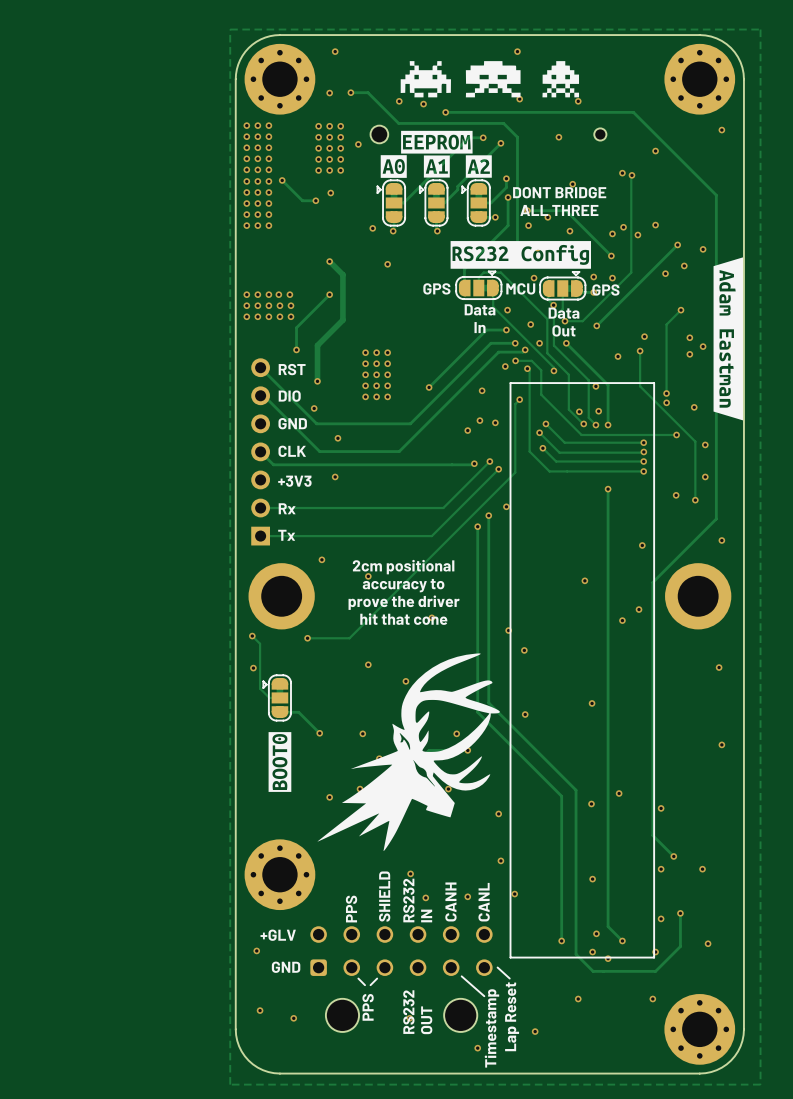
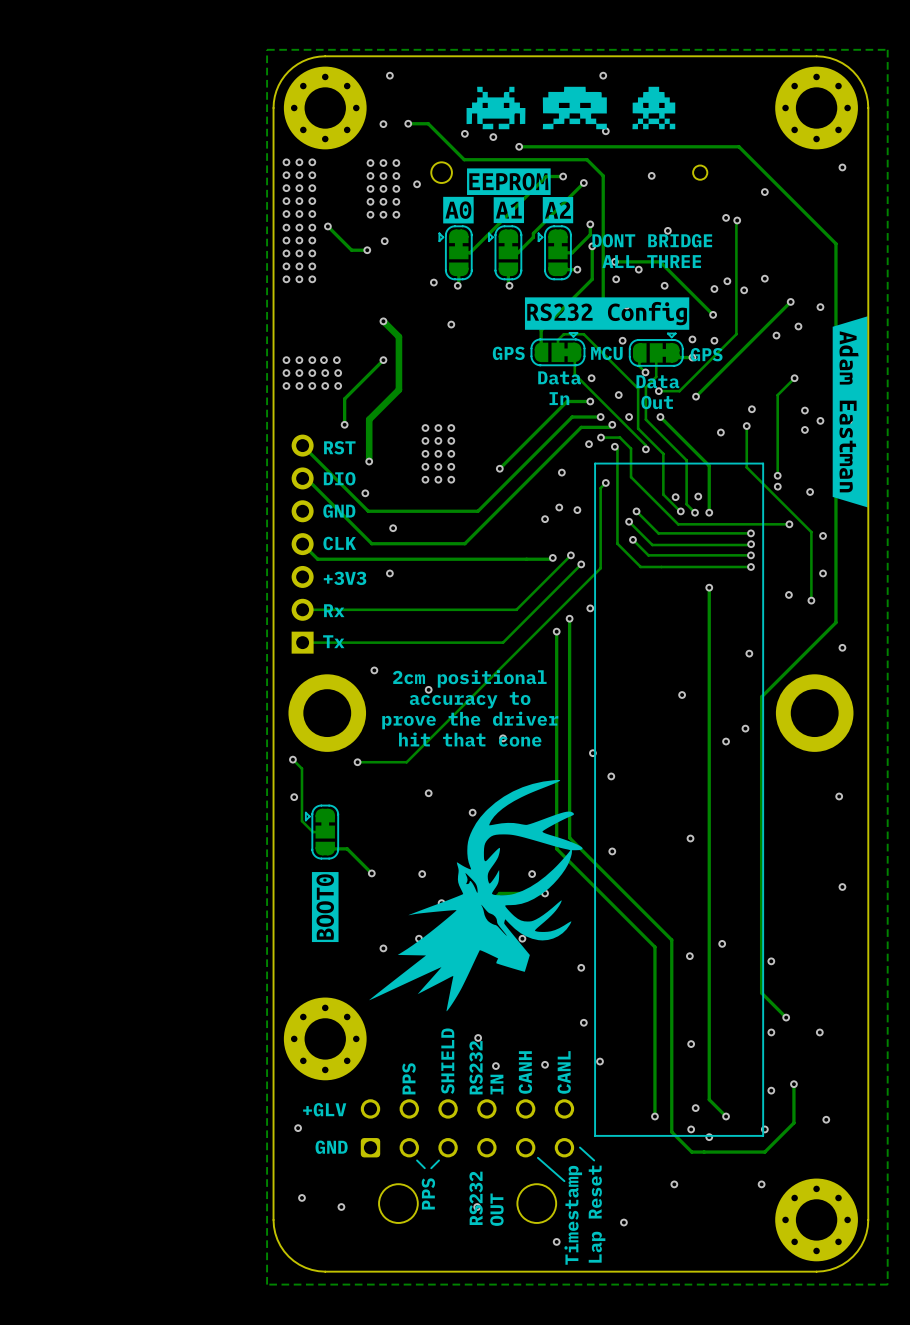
via: (578, 101) -> none
via: (595, 386) -> none

